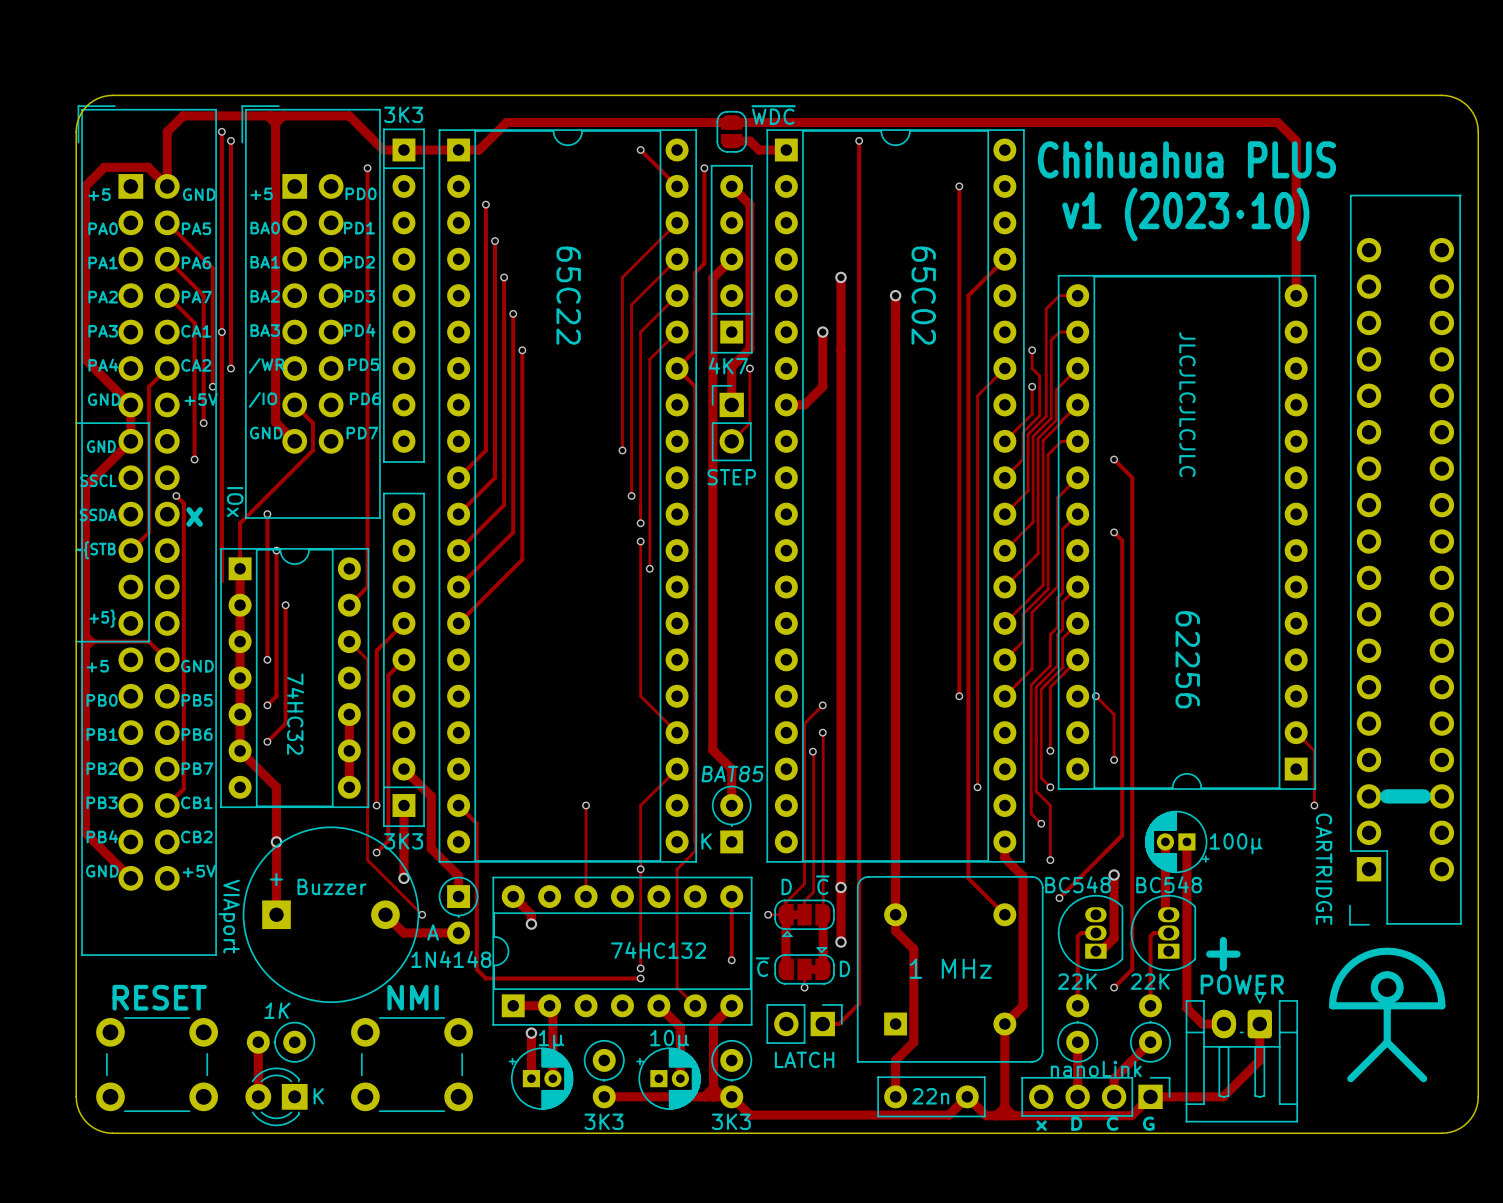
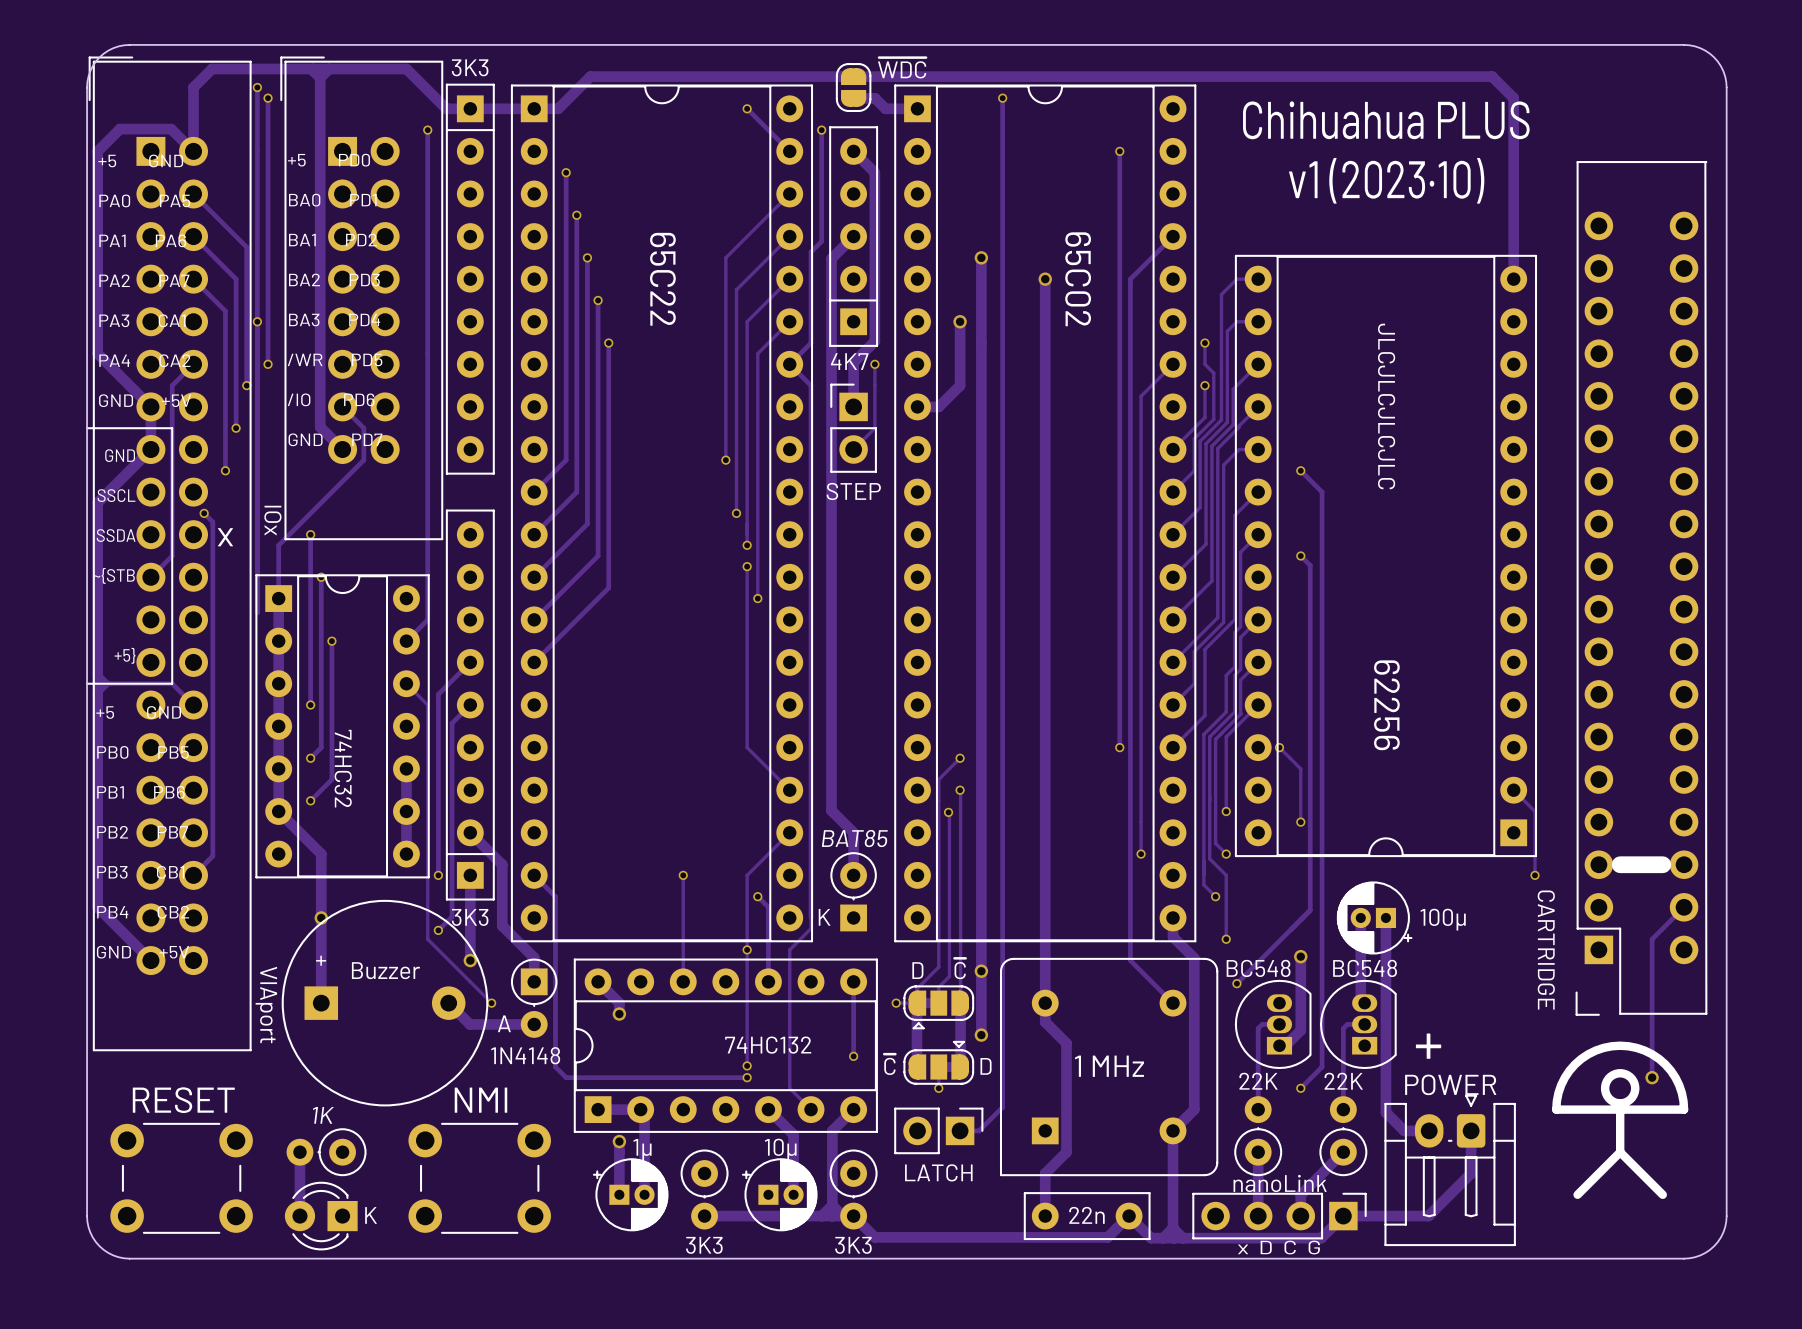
track: none -> (757, 896) (768, 907) (768, 981)
via: none -> (757, 896)
track: none -> (1684, 907) (1652, 939) (1652, 1077)
via: none -> (1652, 1077)

